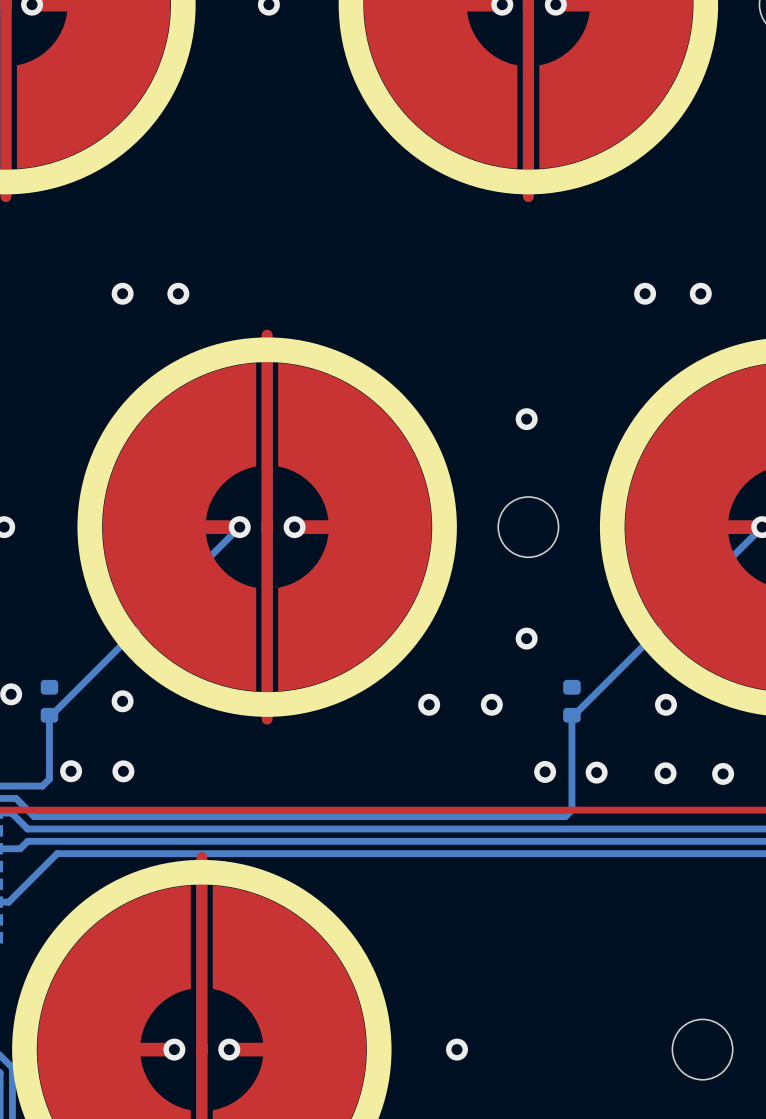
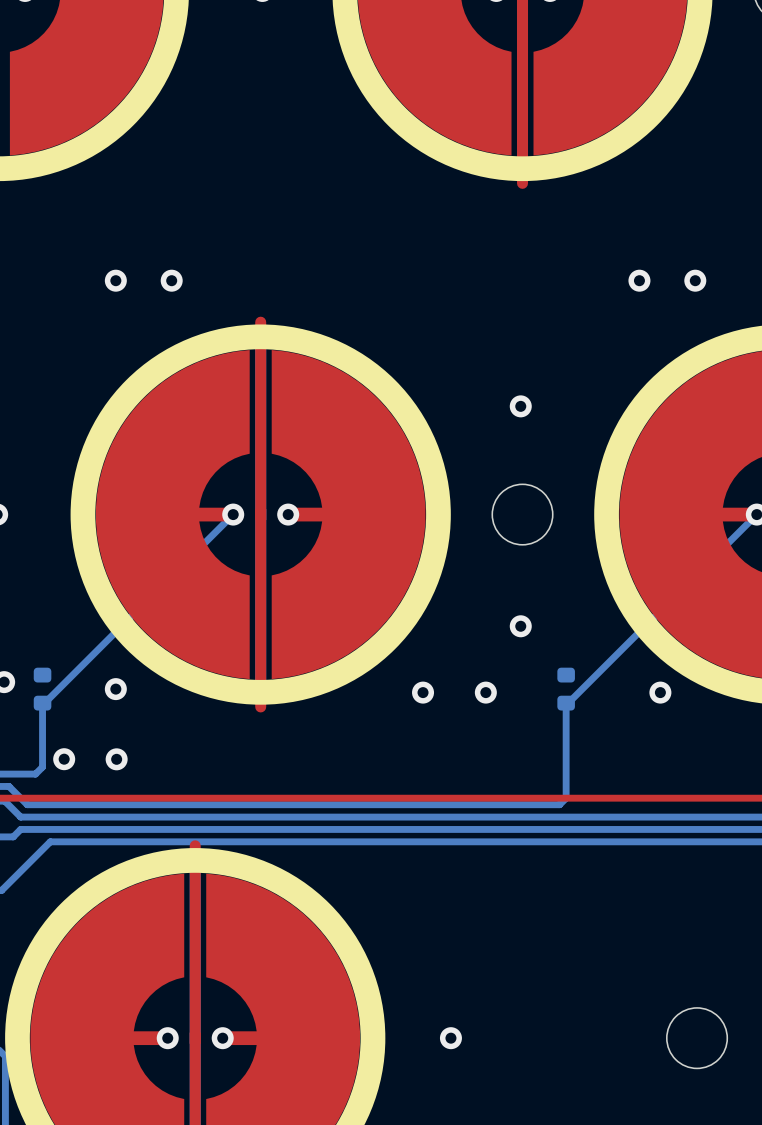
via: (545, 771) -> none
via: (596, 772) -> none
via: (665, 773) -> none
via: (723, 773) -> none

